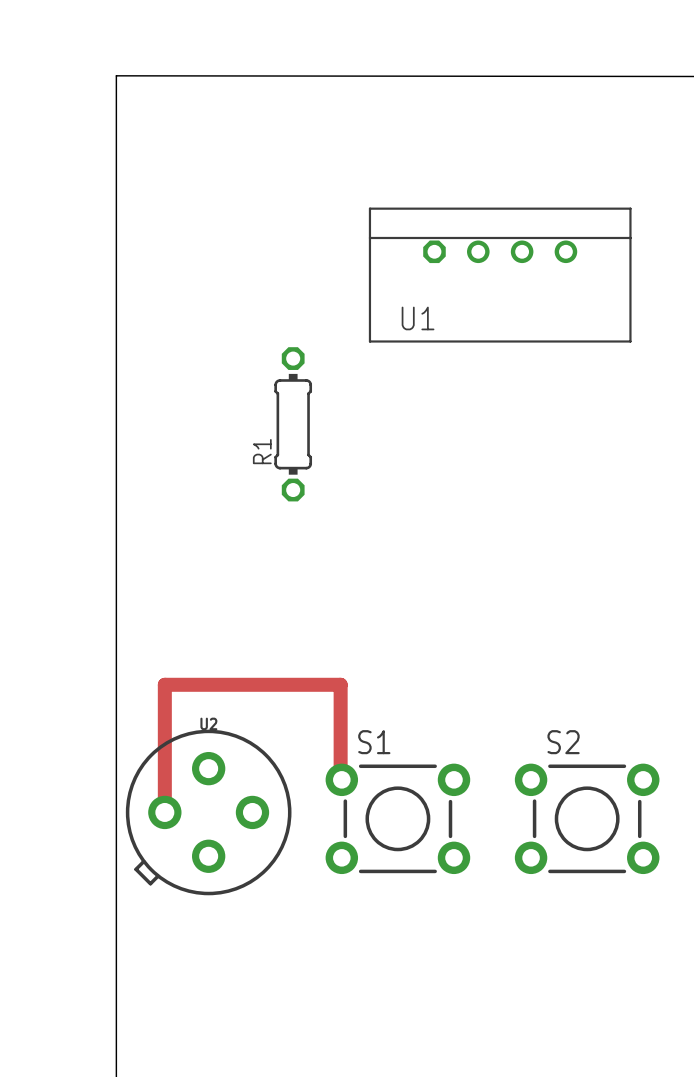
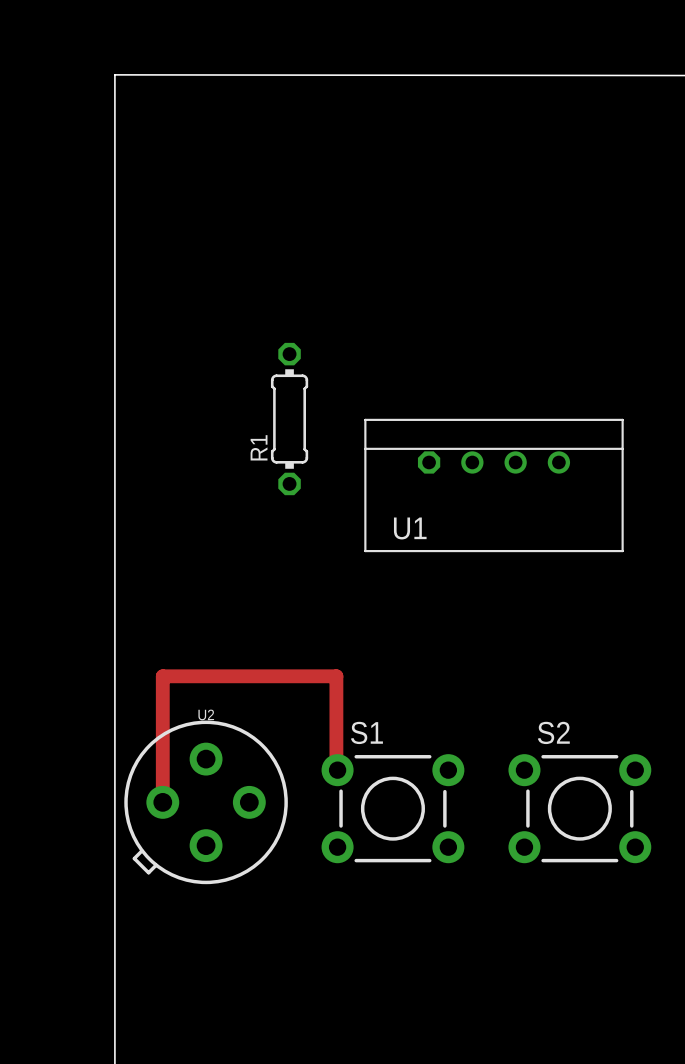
U1 position: (500, 275) -> (493, 485)

